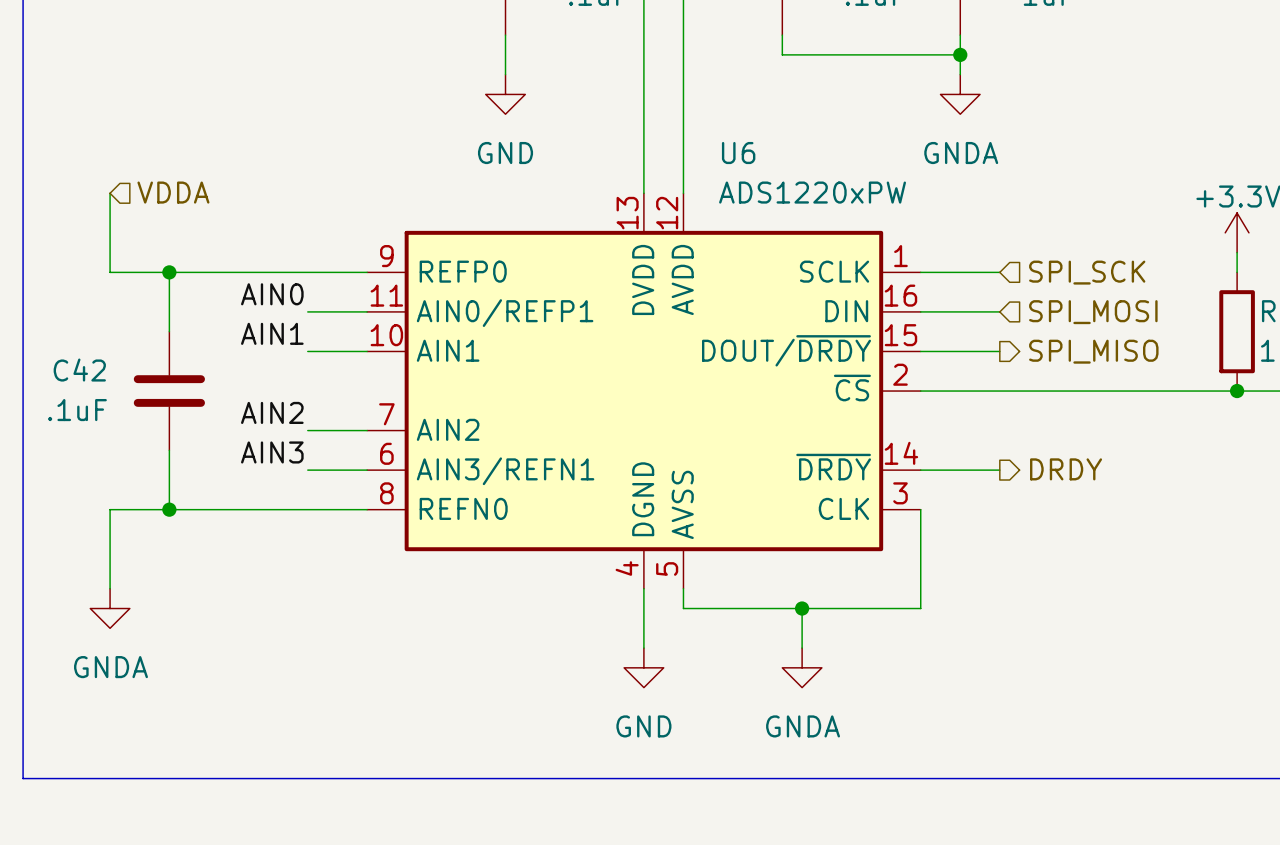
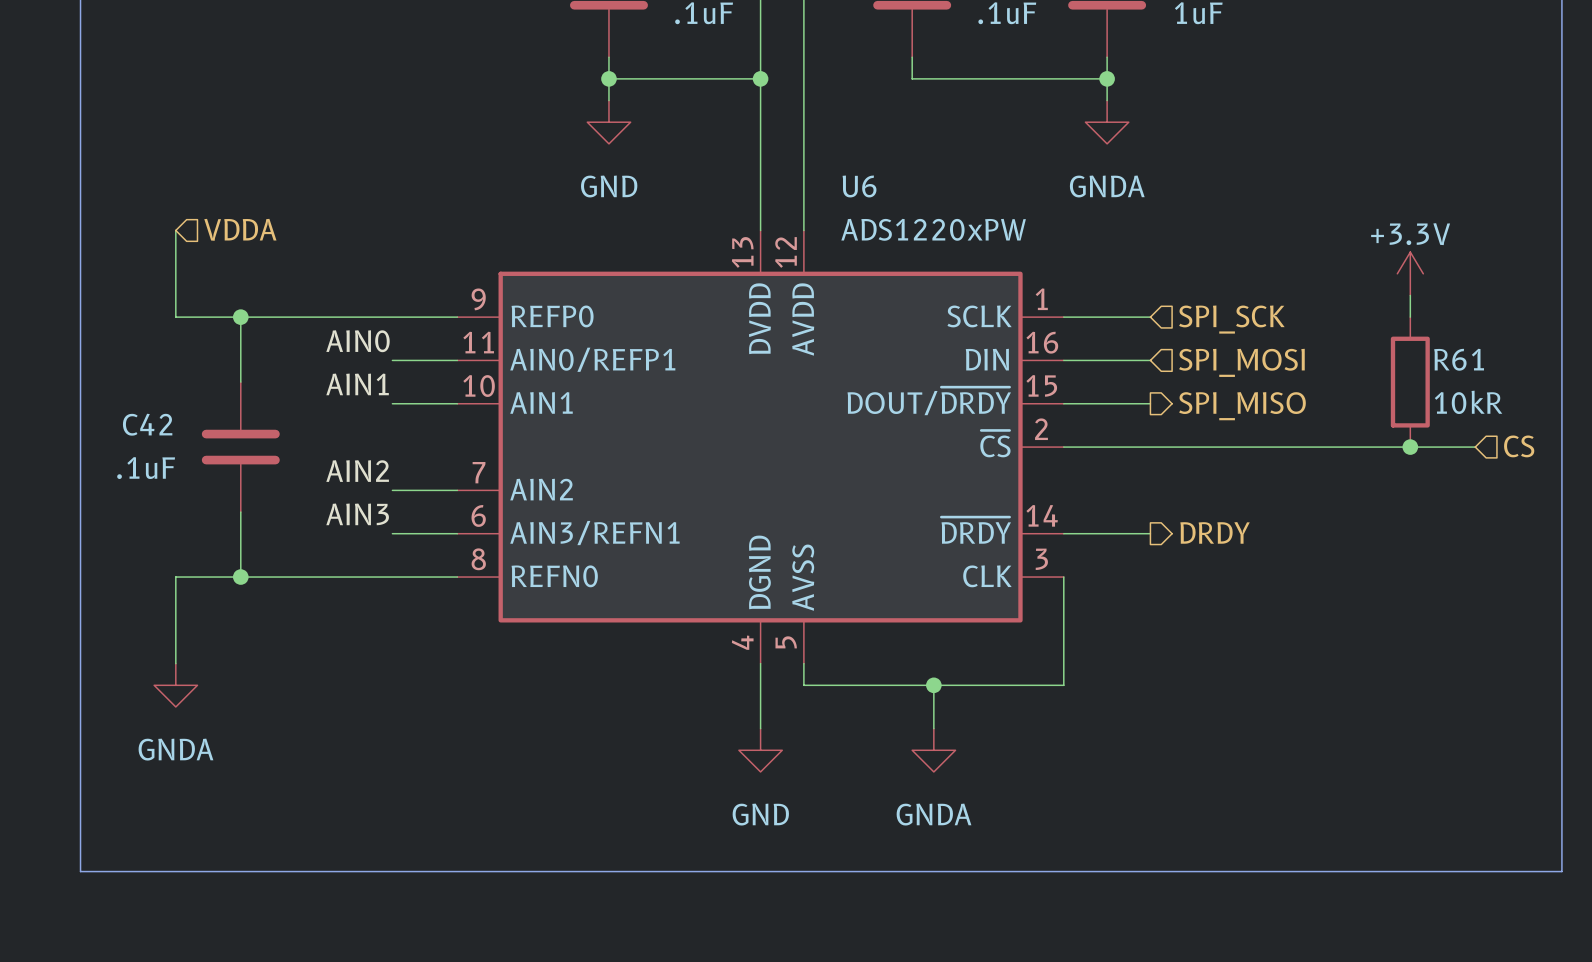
wire: none -> (608, 78) (760, 78)
junction: none -> (608, 78)
junction: none -> (760, 78)

